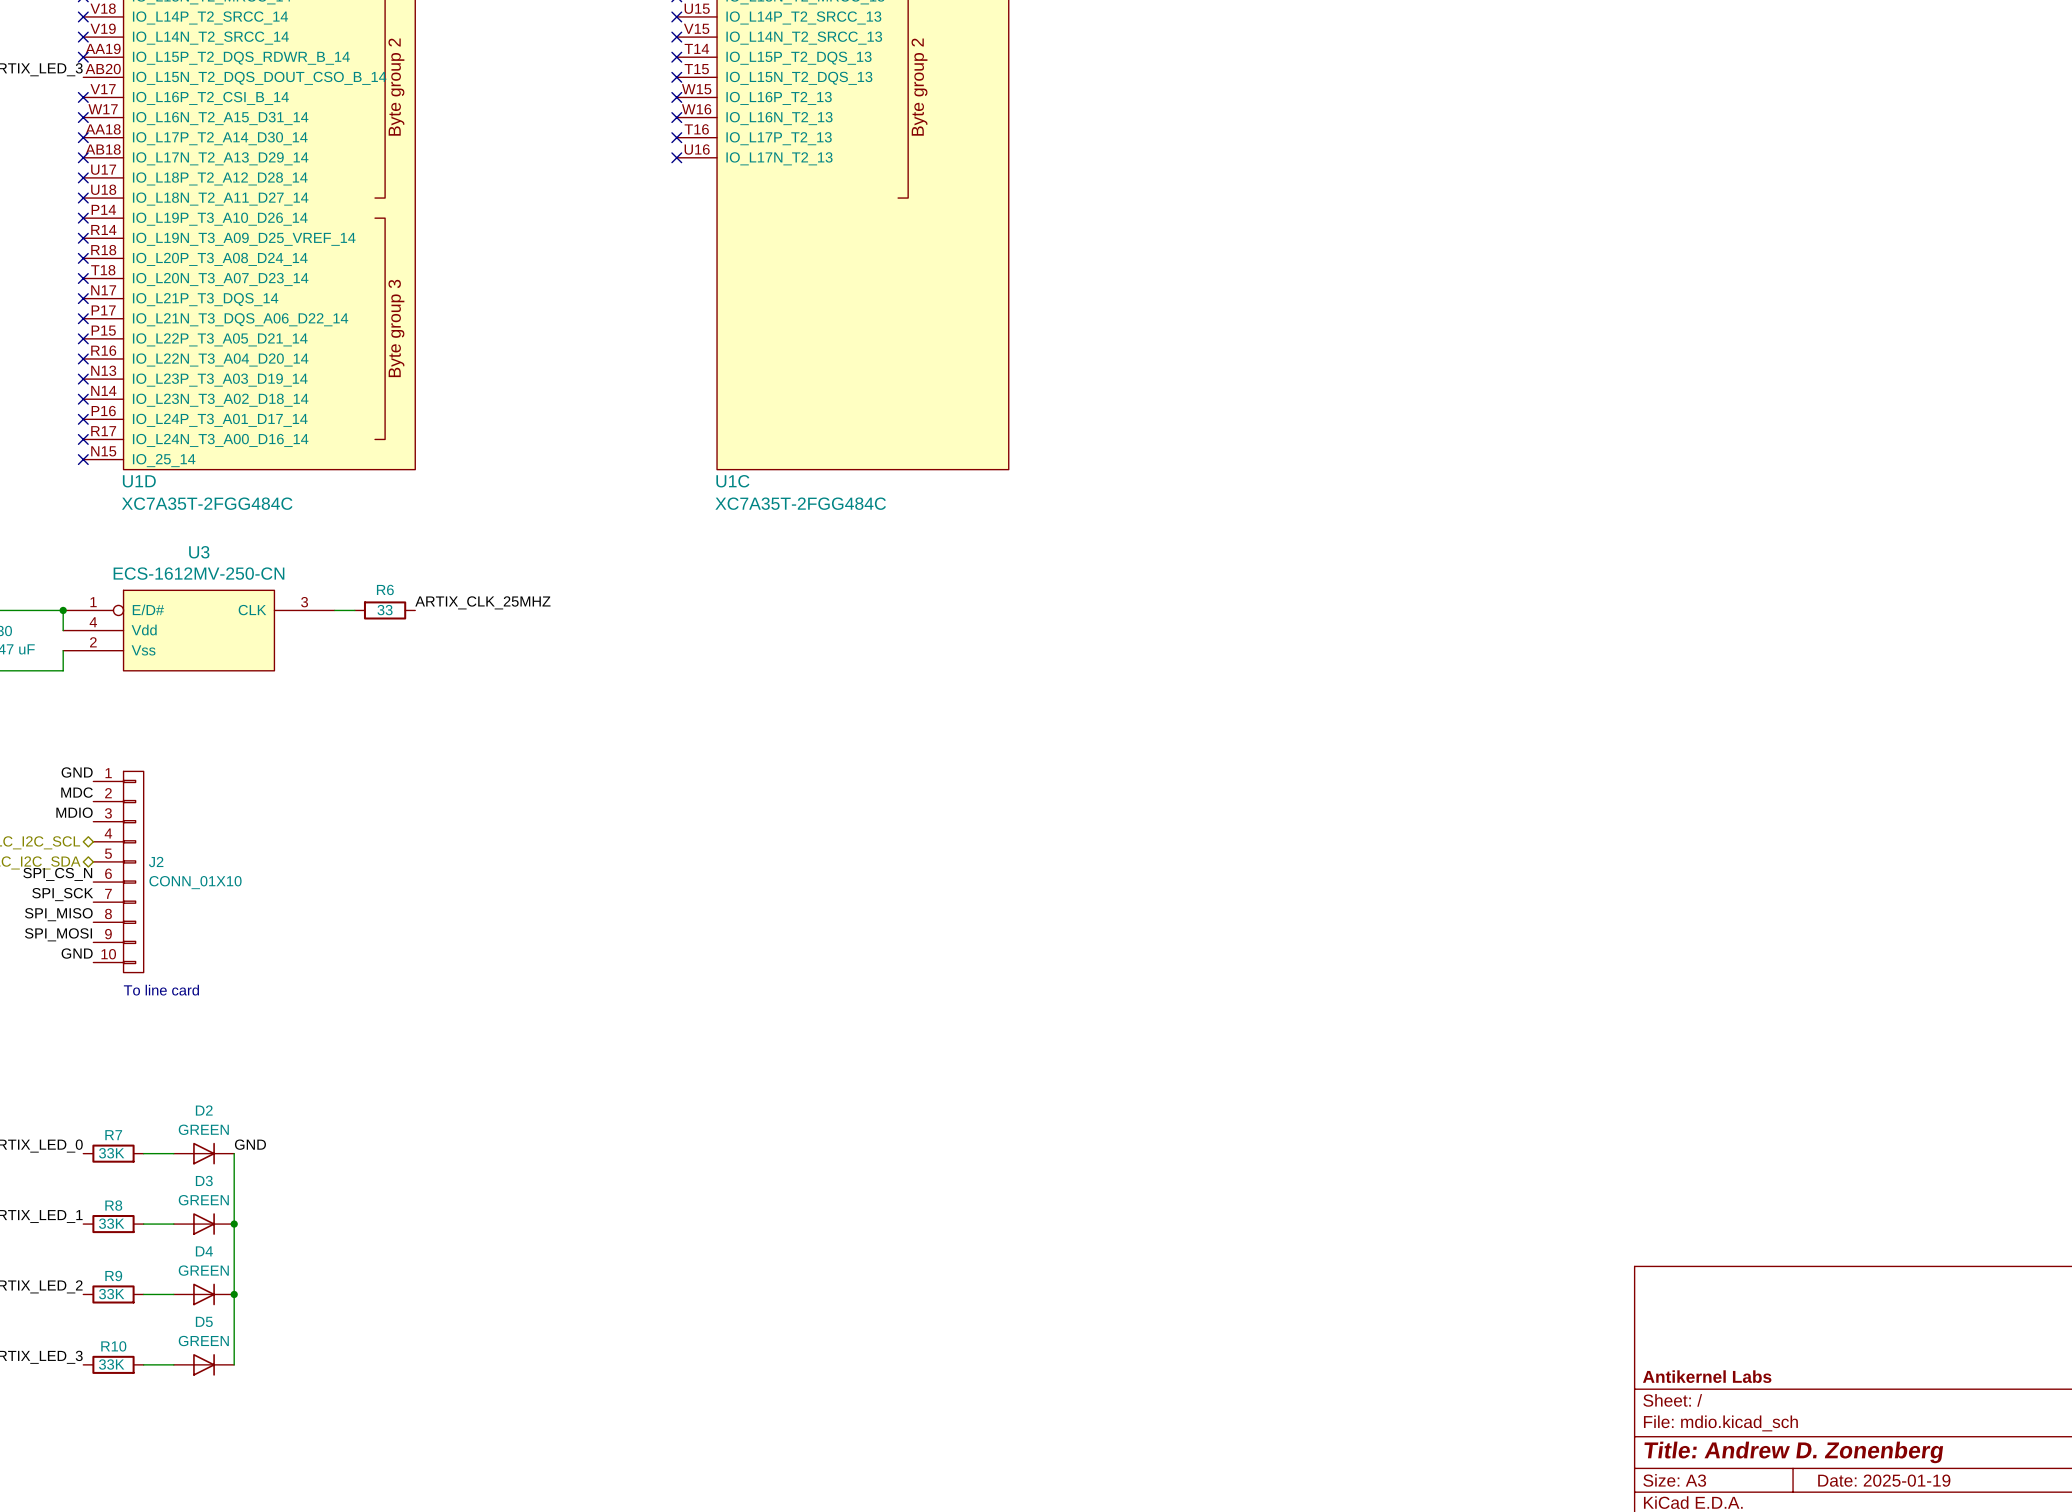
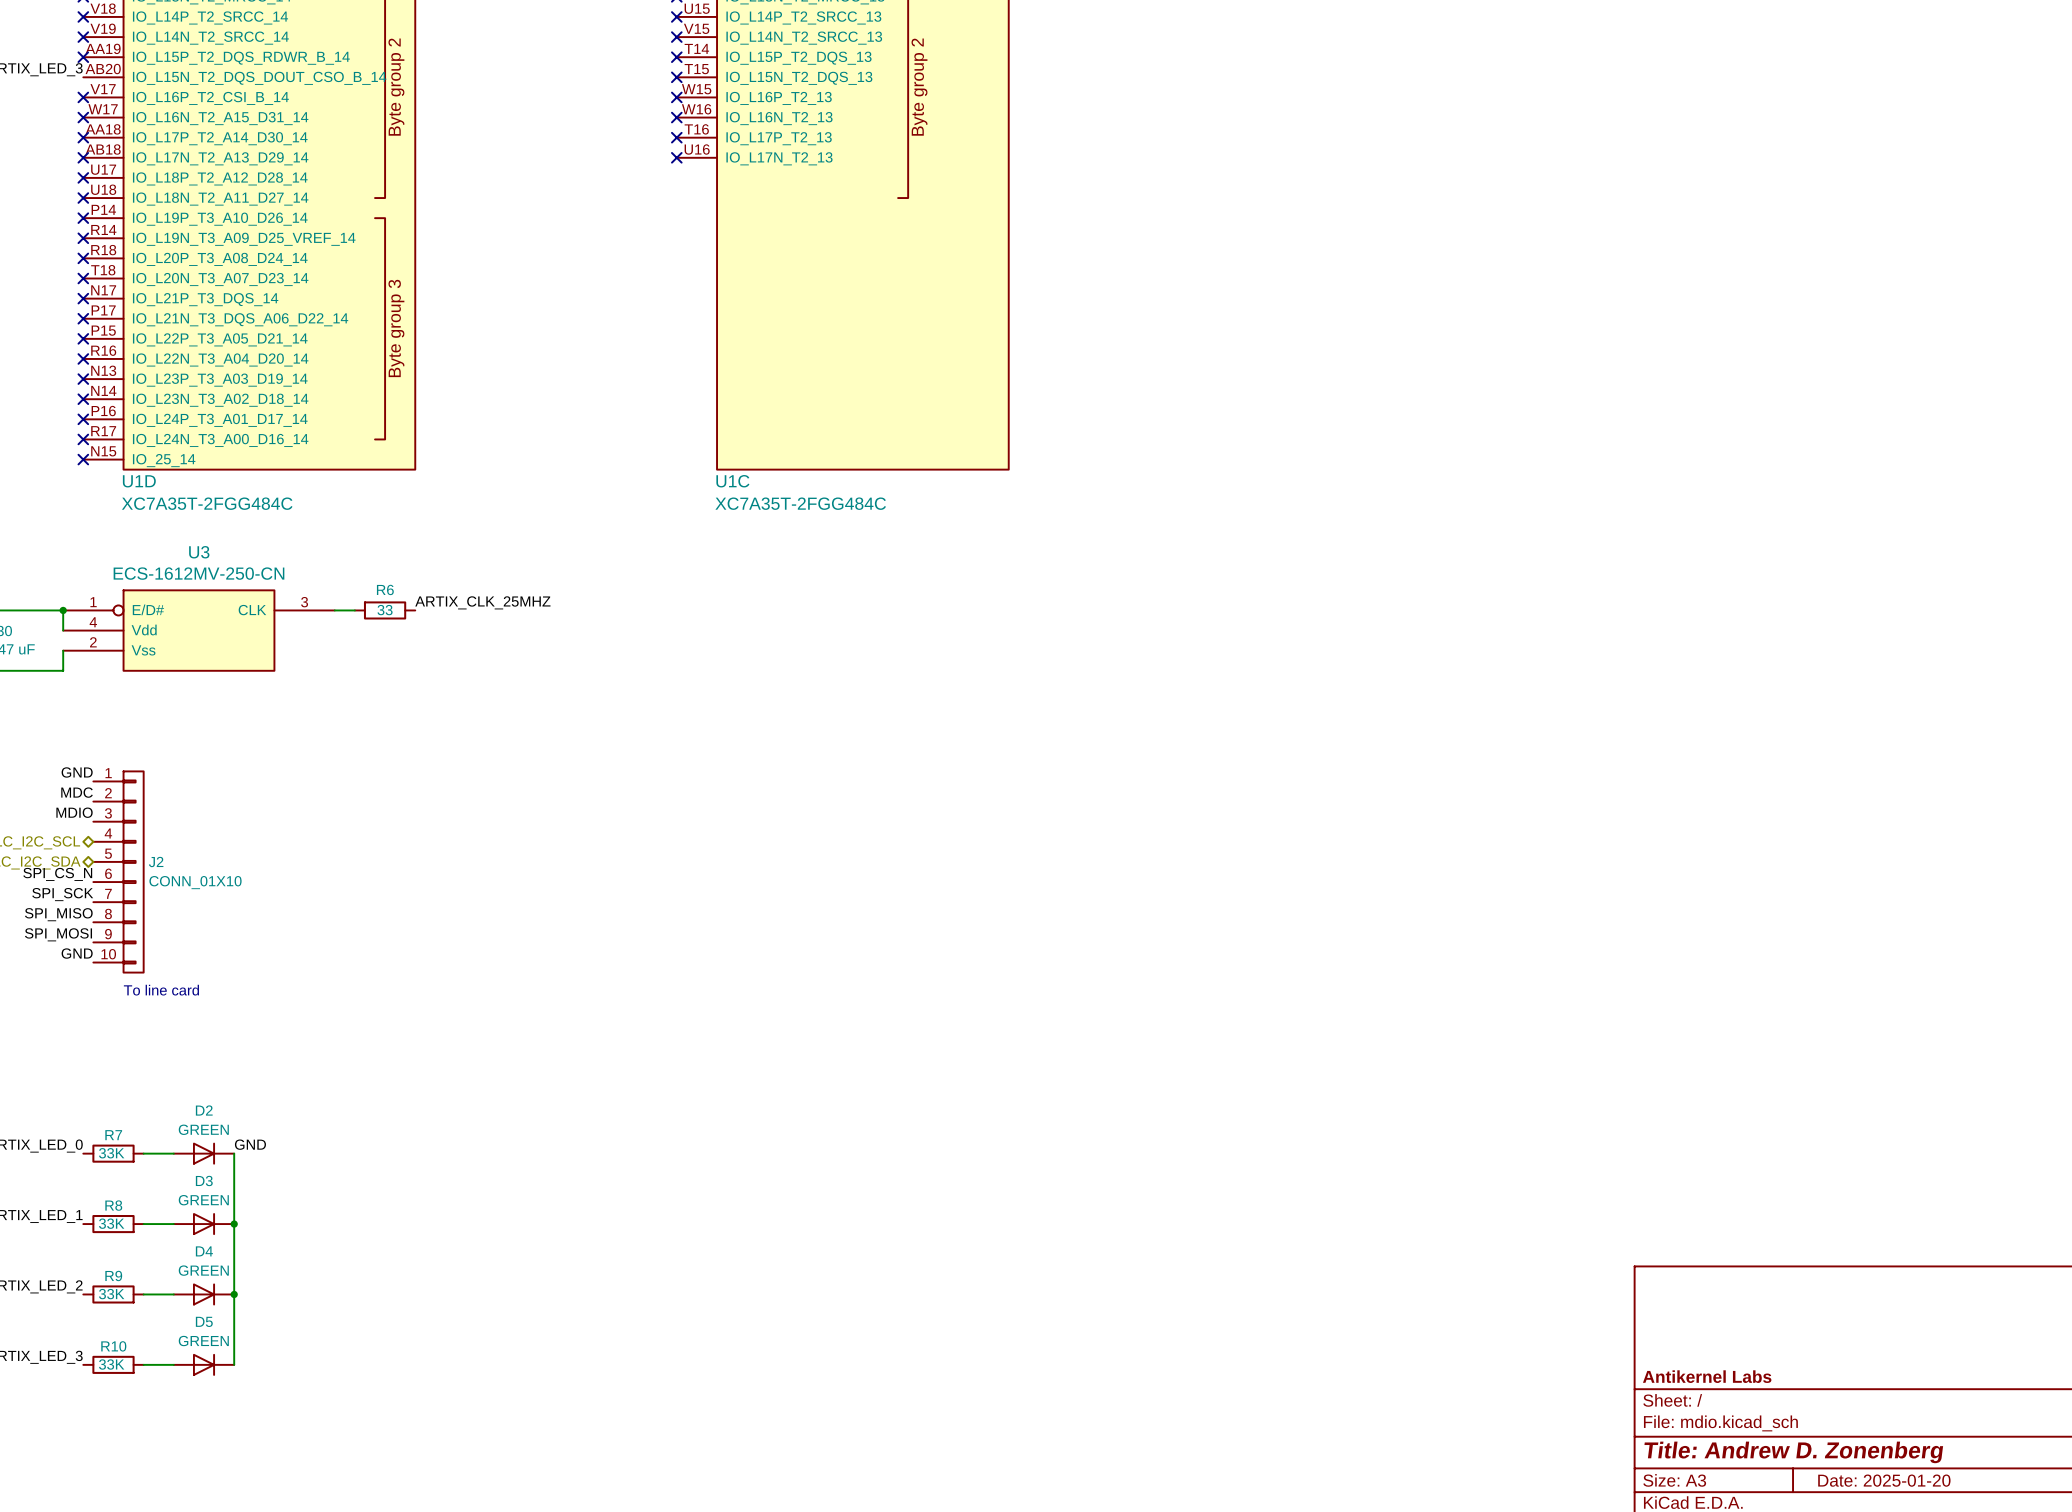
title block: Date: 2025-01-19 (1884, 1480) -> Date: 2025-01-20 (1884, 1480)

